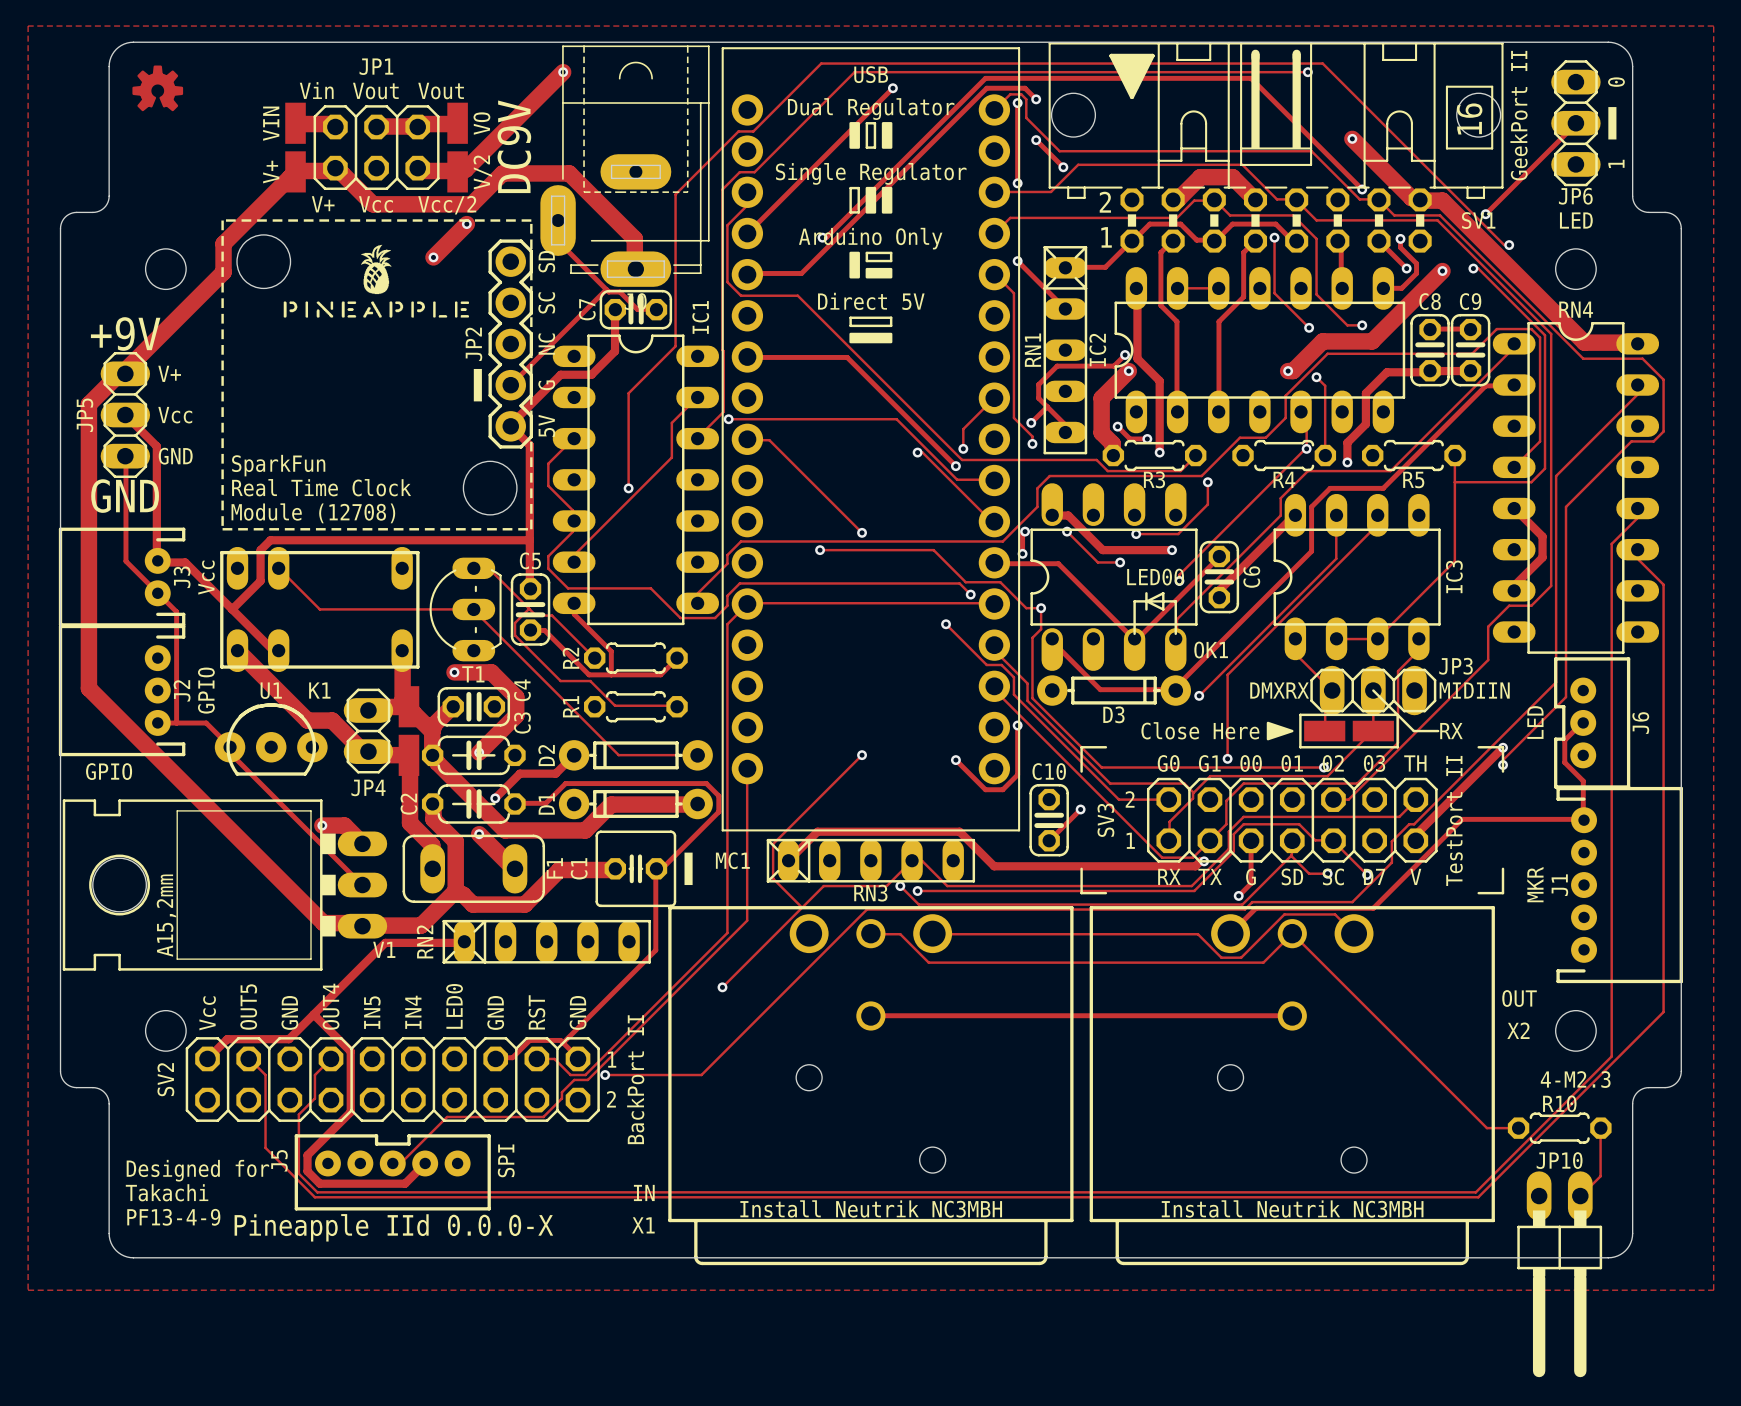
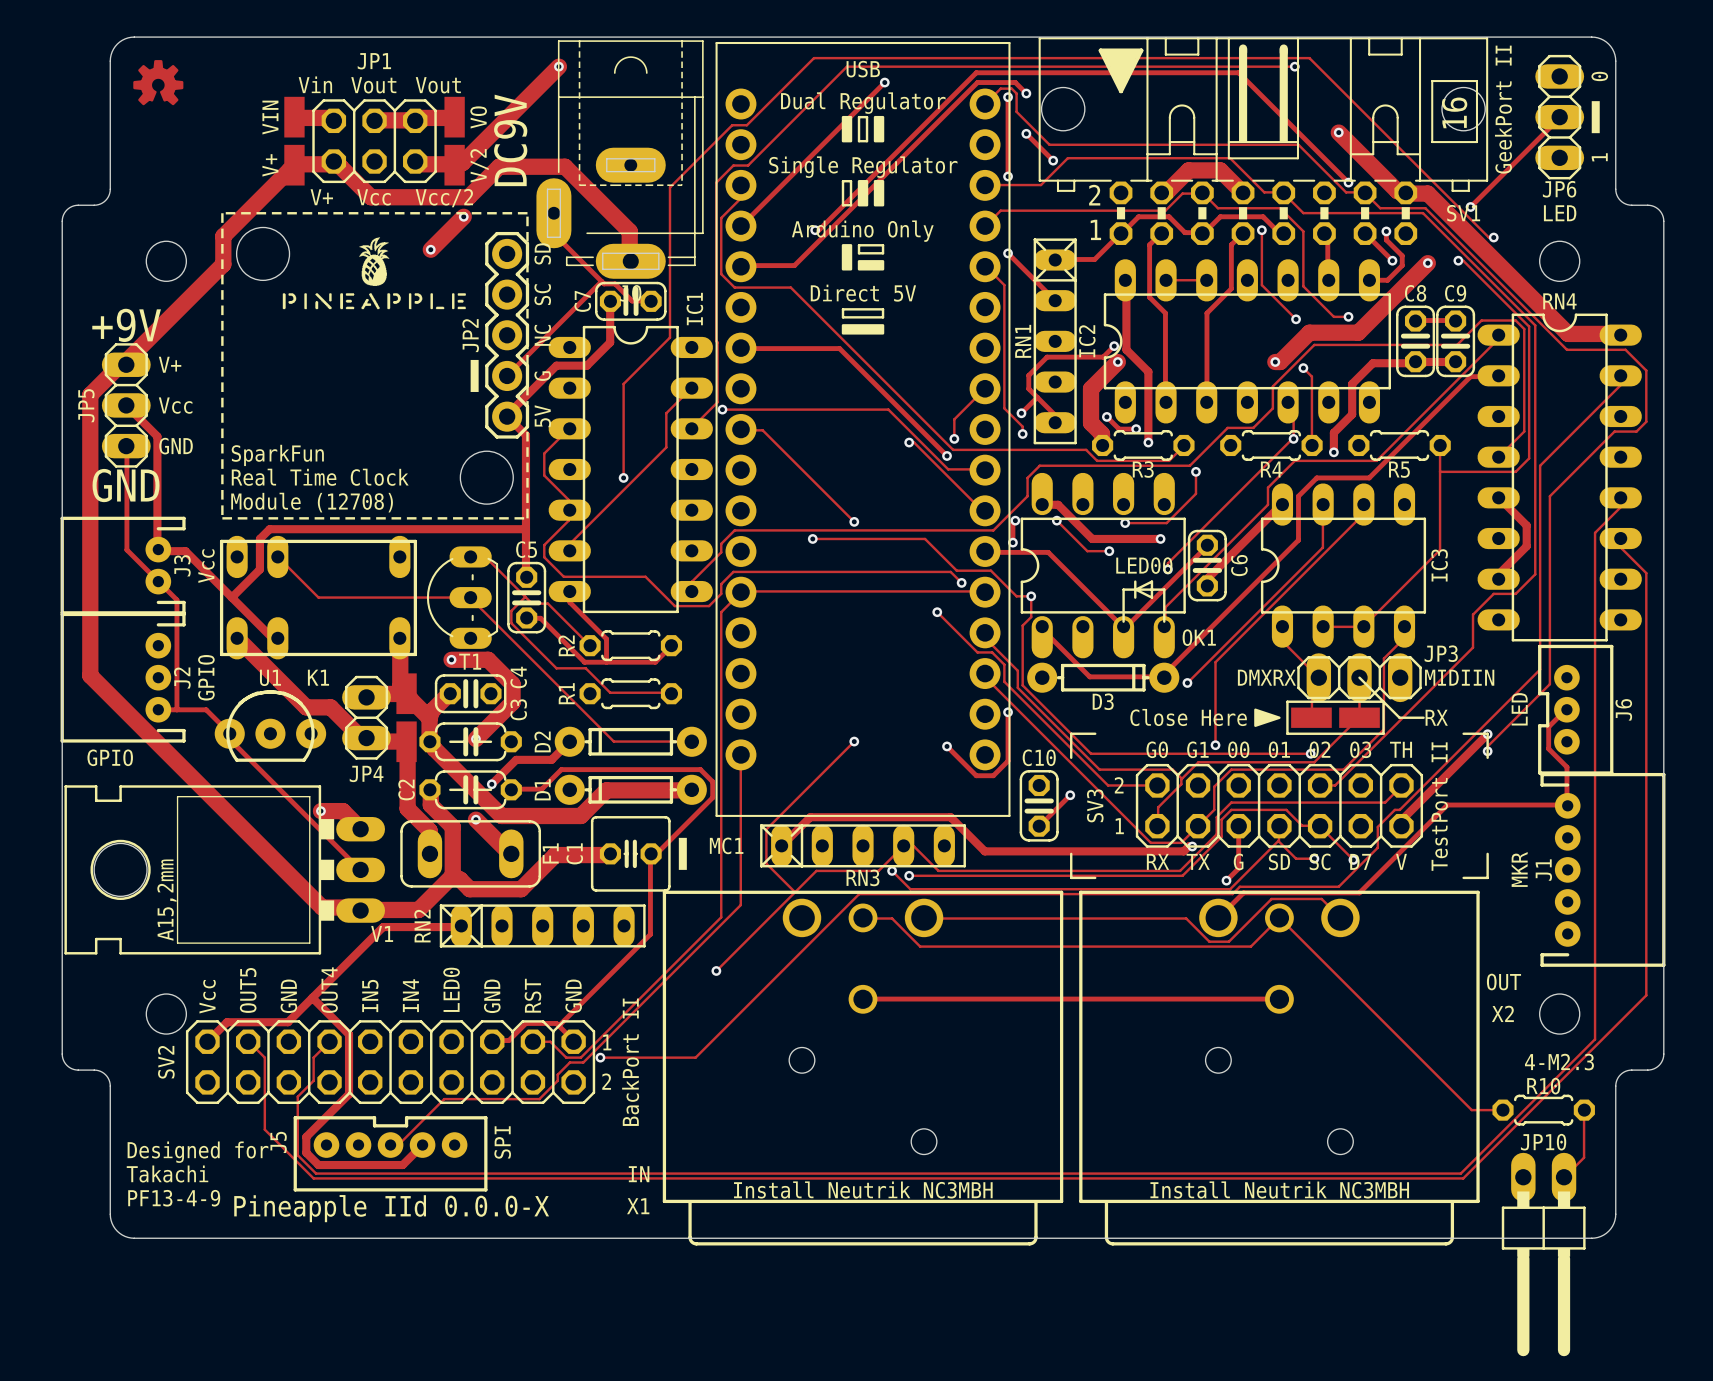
zone outline: (28, 26) (1713, 26) (1713, 1290) (28, 1290) (28, 26) -> none

